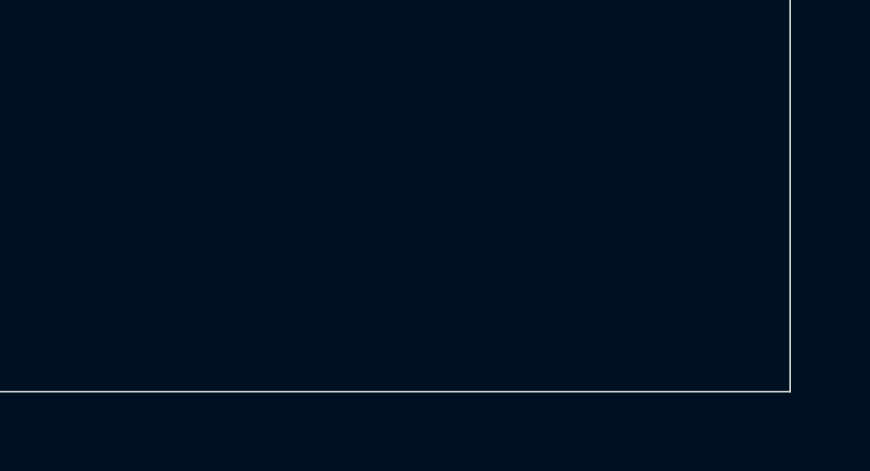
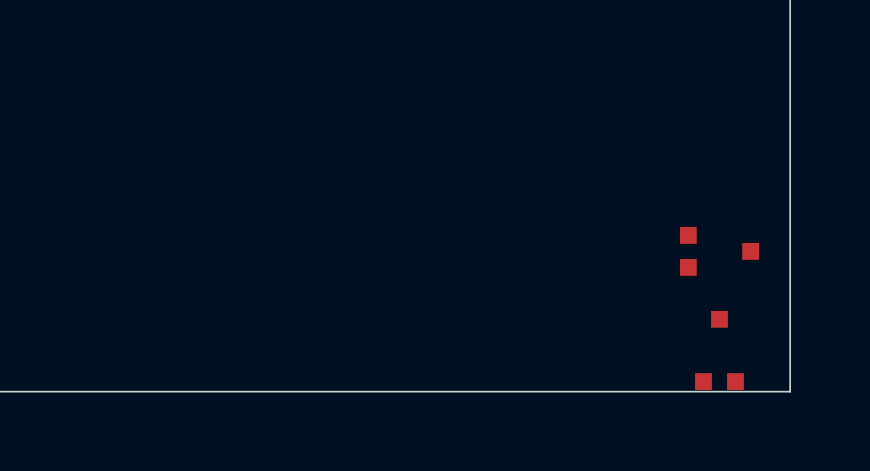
part: none -> (719, 251)
part: none -> (719, 350)

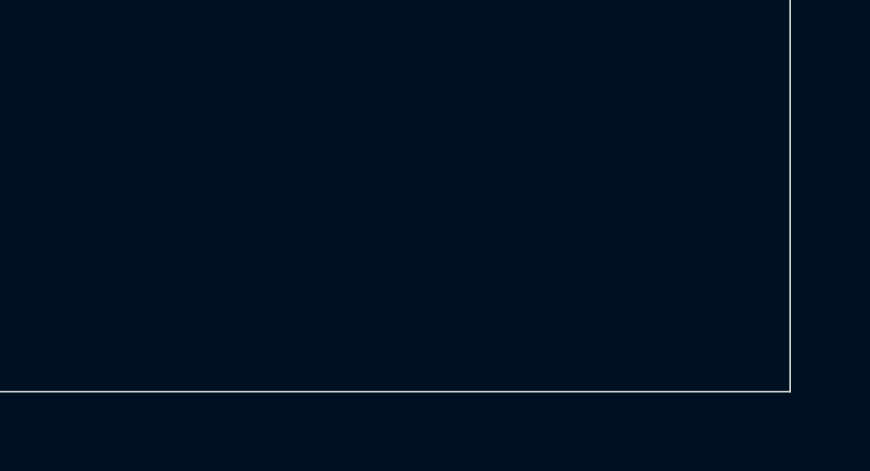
part: (719, 251) -> none
part: (719, 350) -> none

